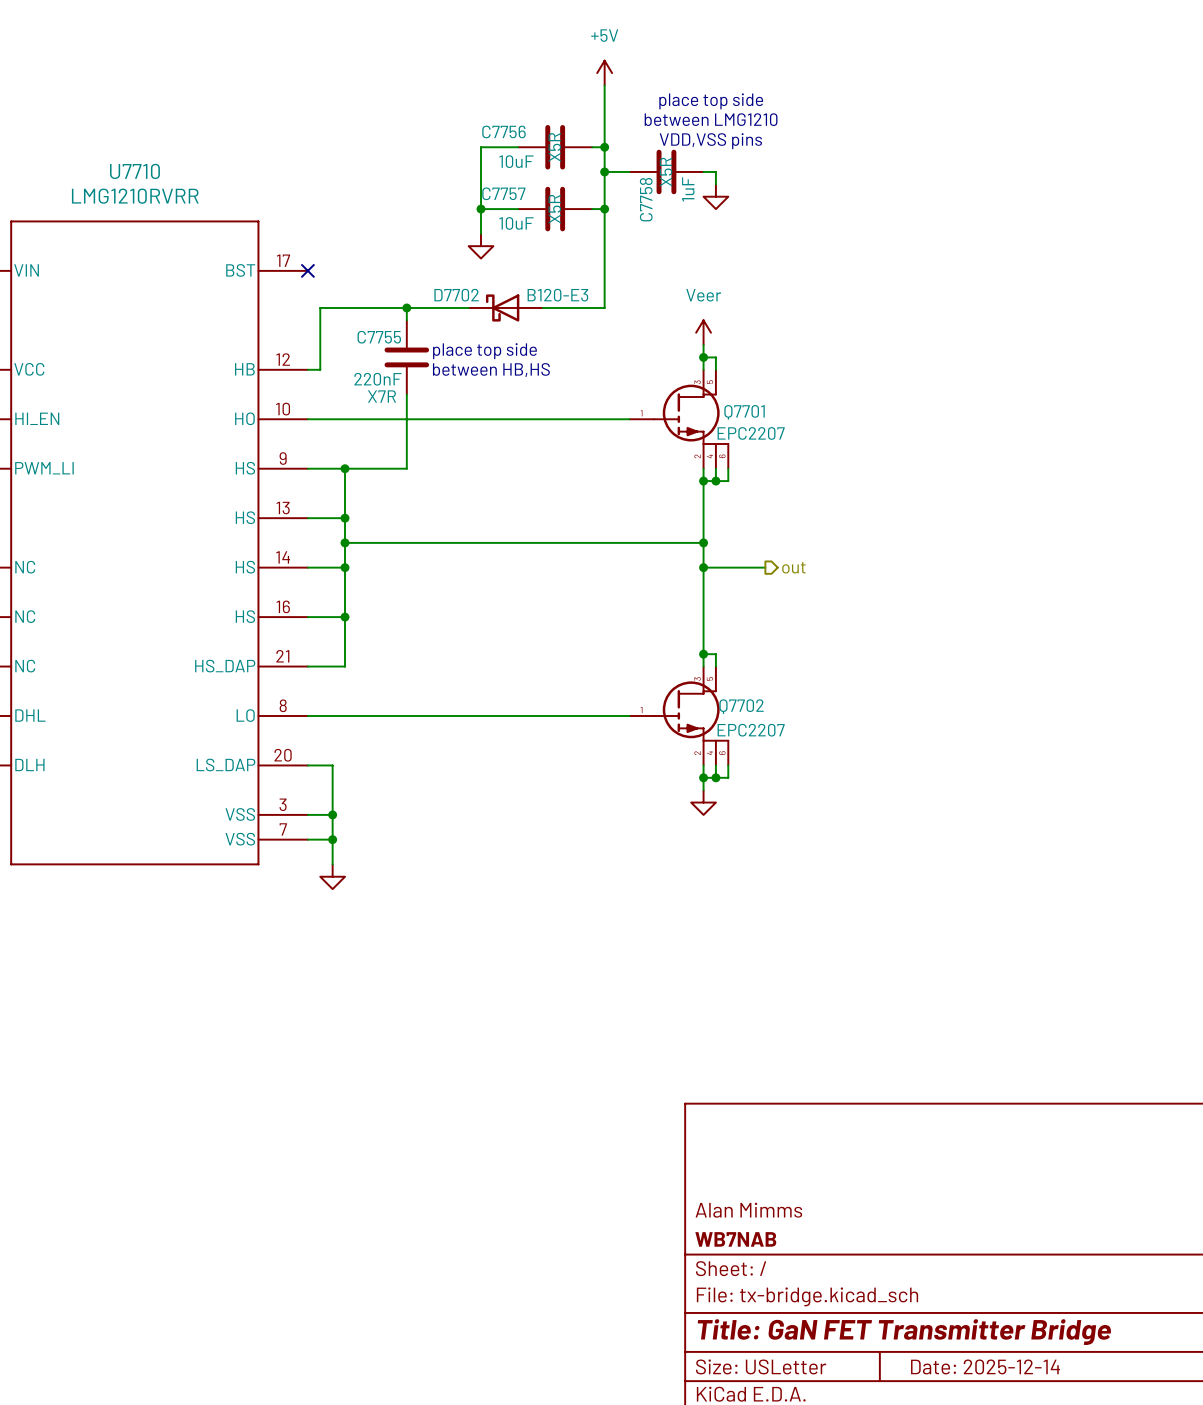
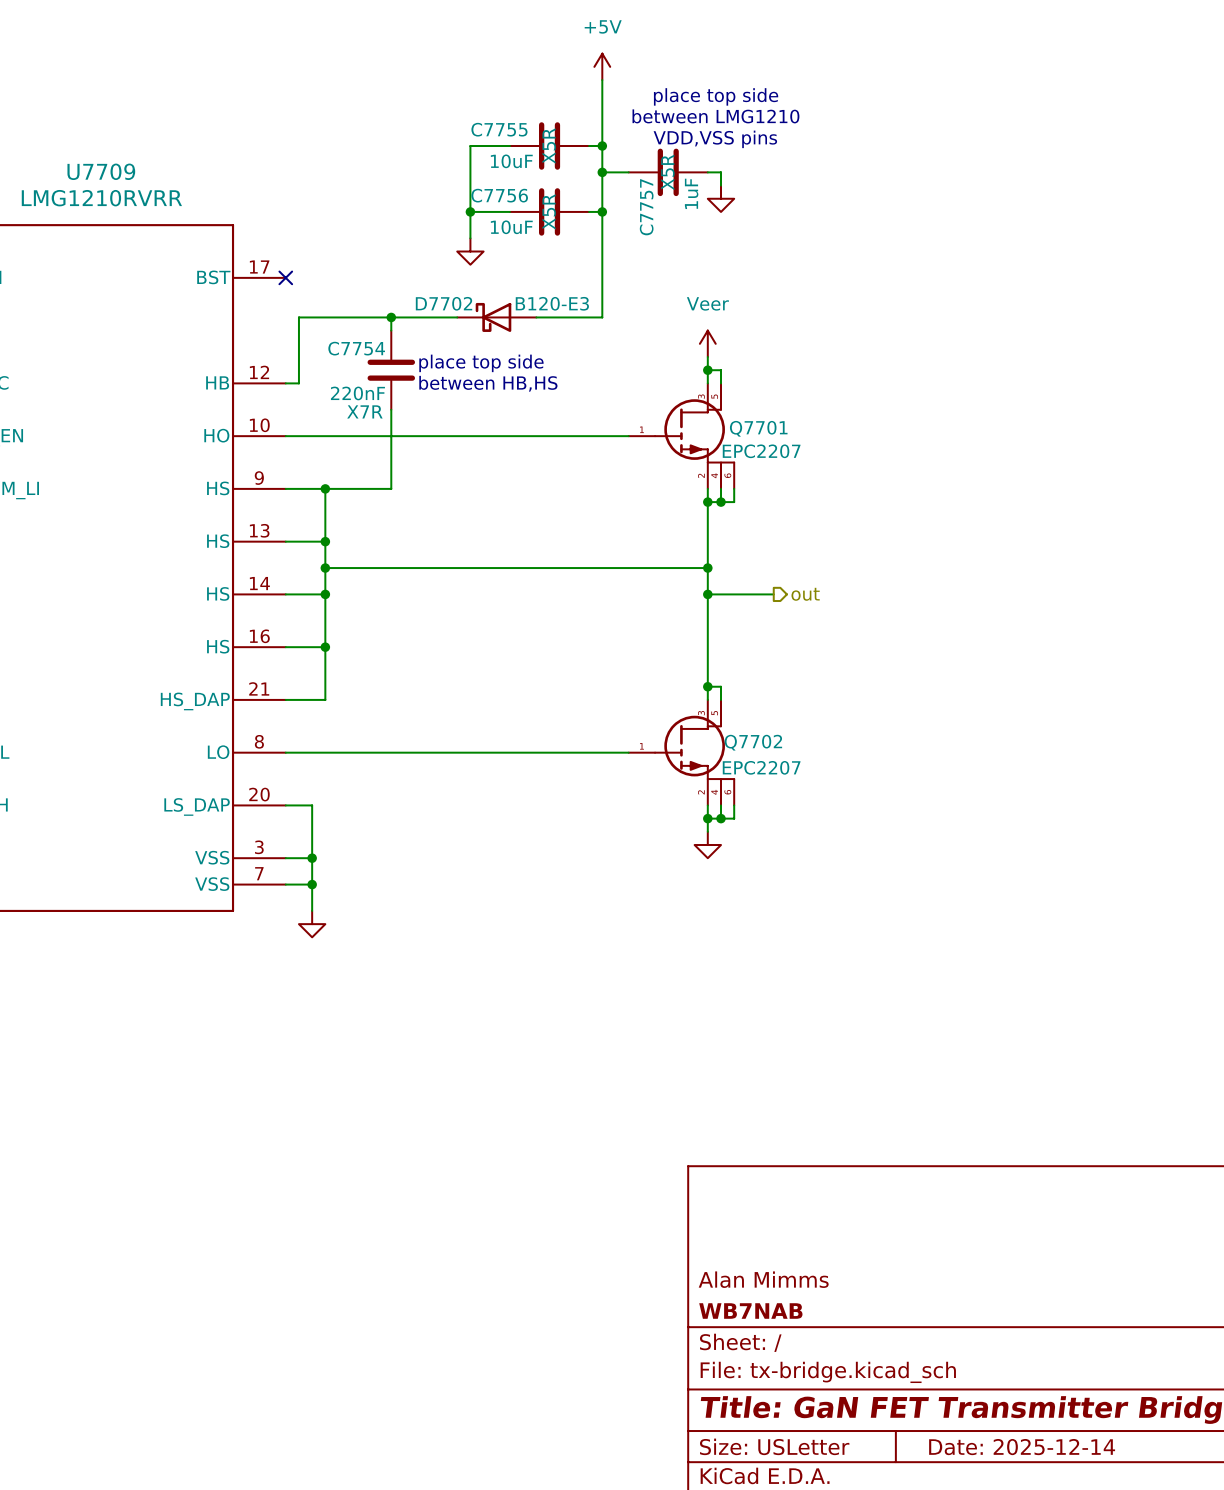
C7756 name: C7756 (504, 131) -> C7755 (499, 129)
U7710 name: U7710 (134, 171) -> U7709 (101, 171)
C7757 name: C7757 (503, 193) -> C7756 (499, 195)
C7758 name: C7758 (646, 199) -> C7757 (646, 207)
C7755 name: C7755 (379, 337) -> C7754 (356, 348)

